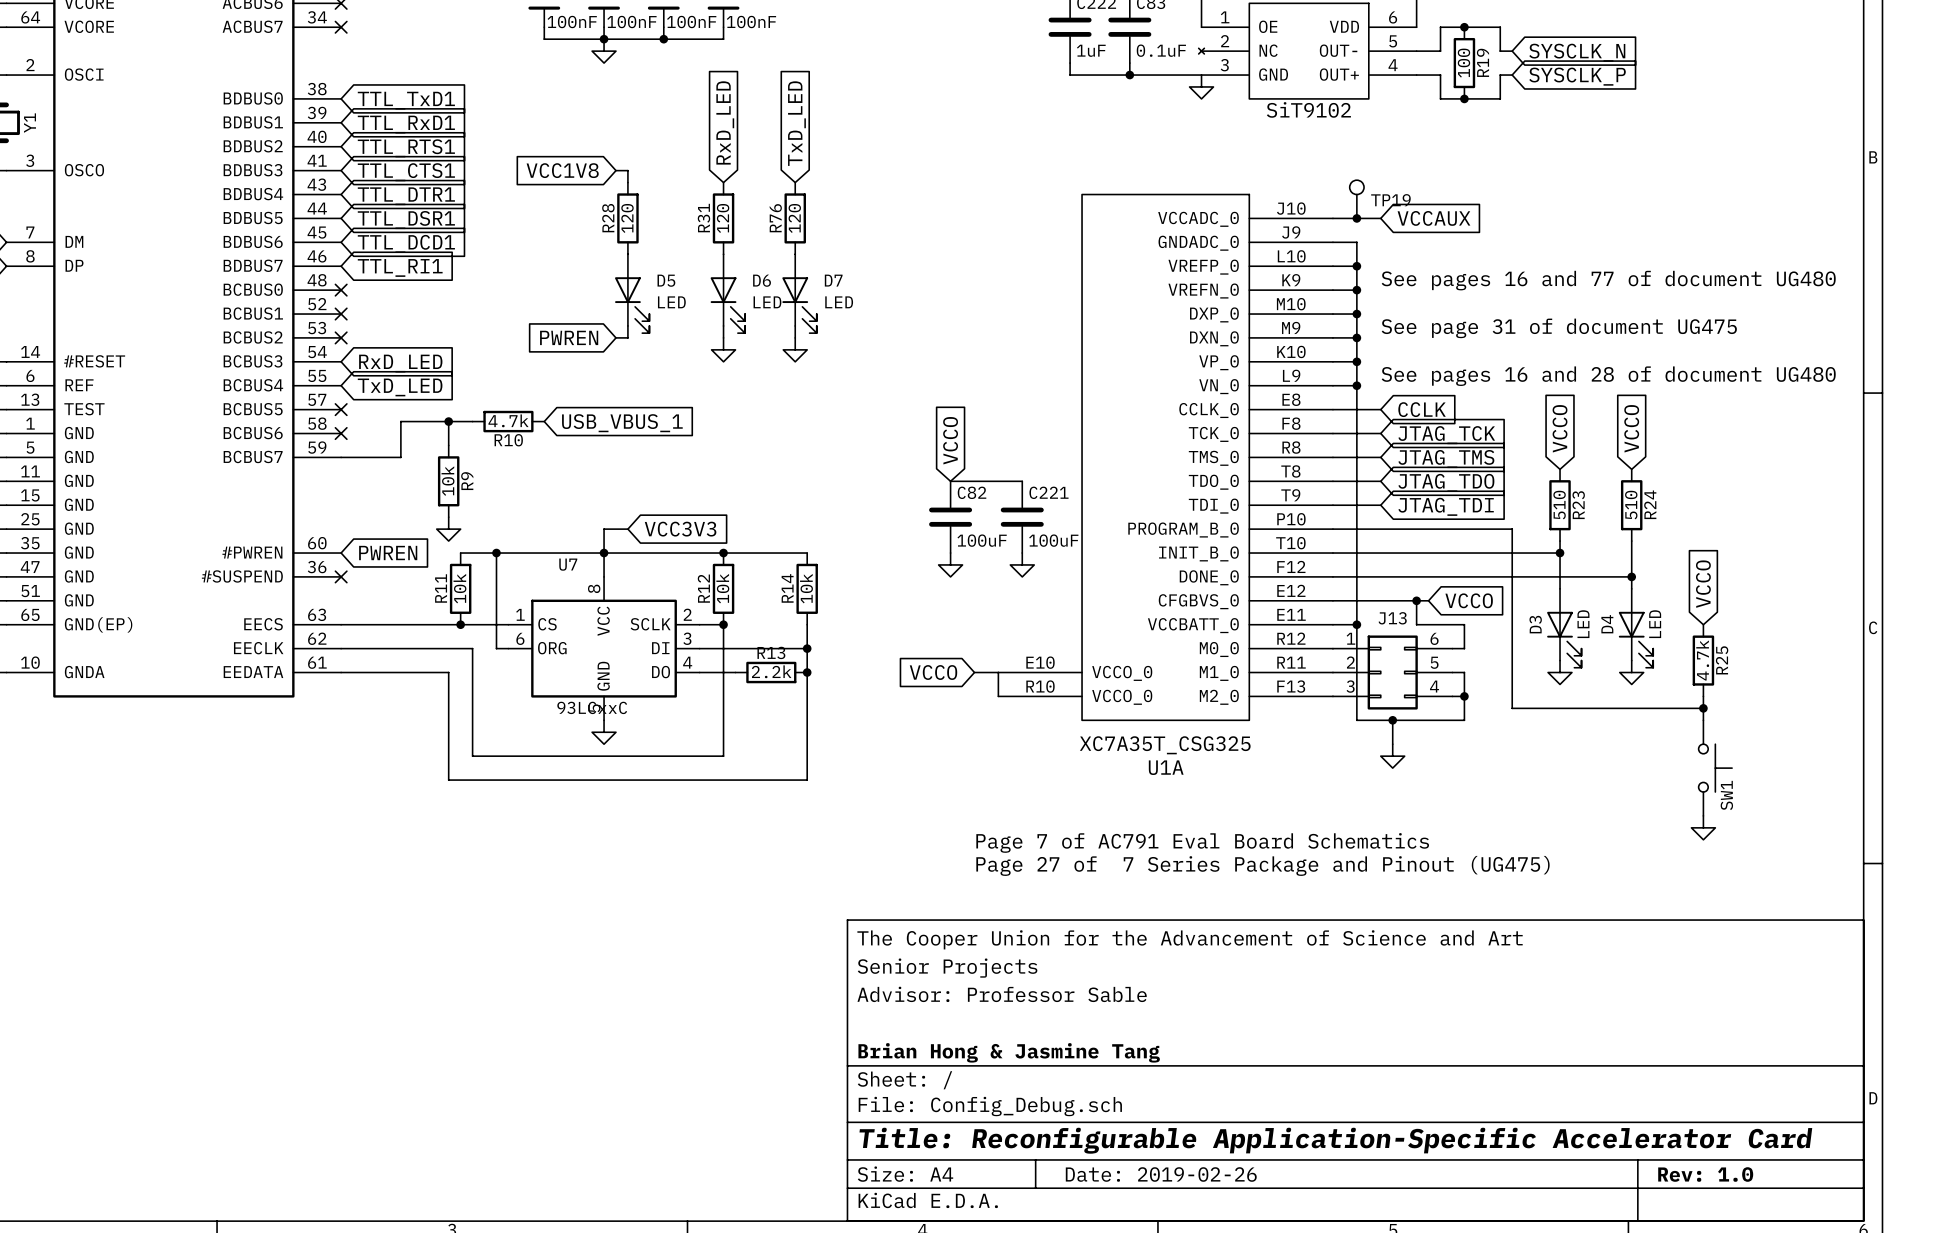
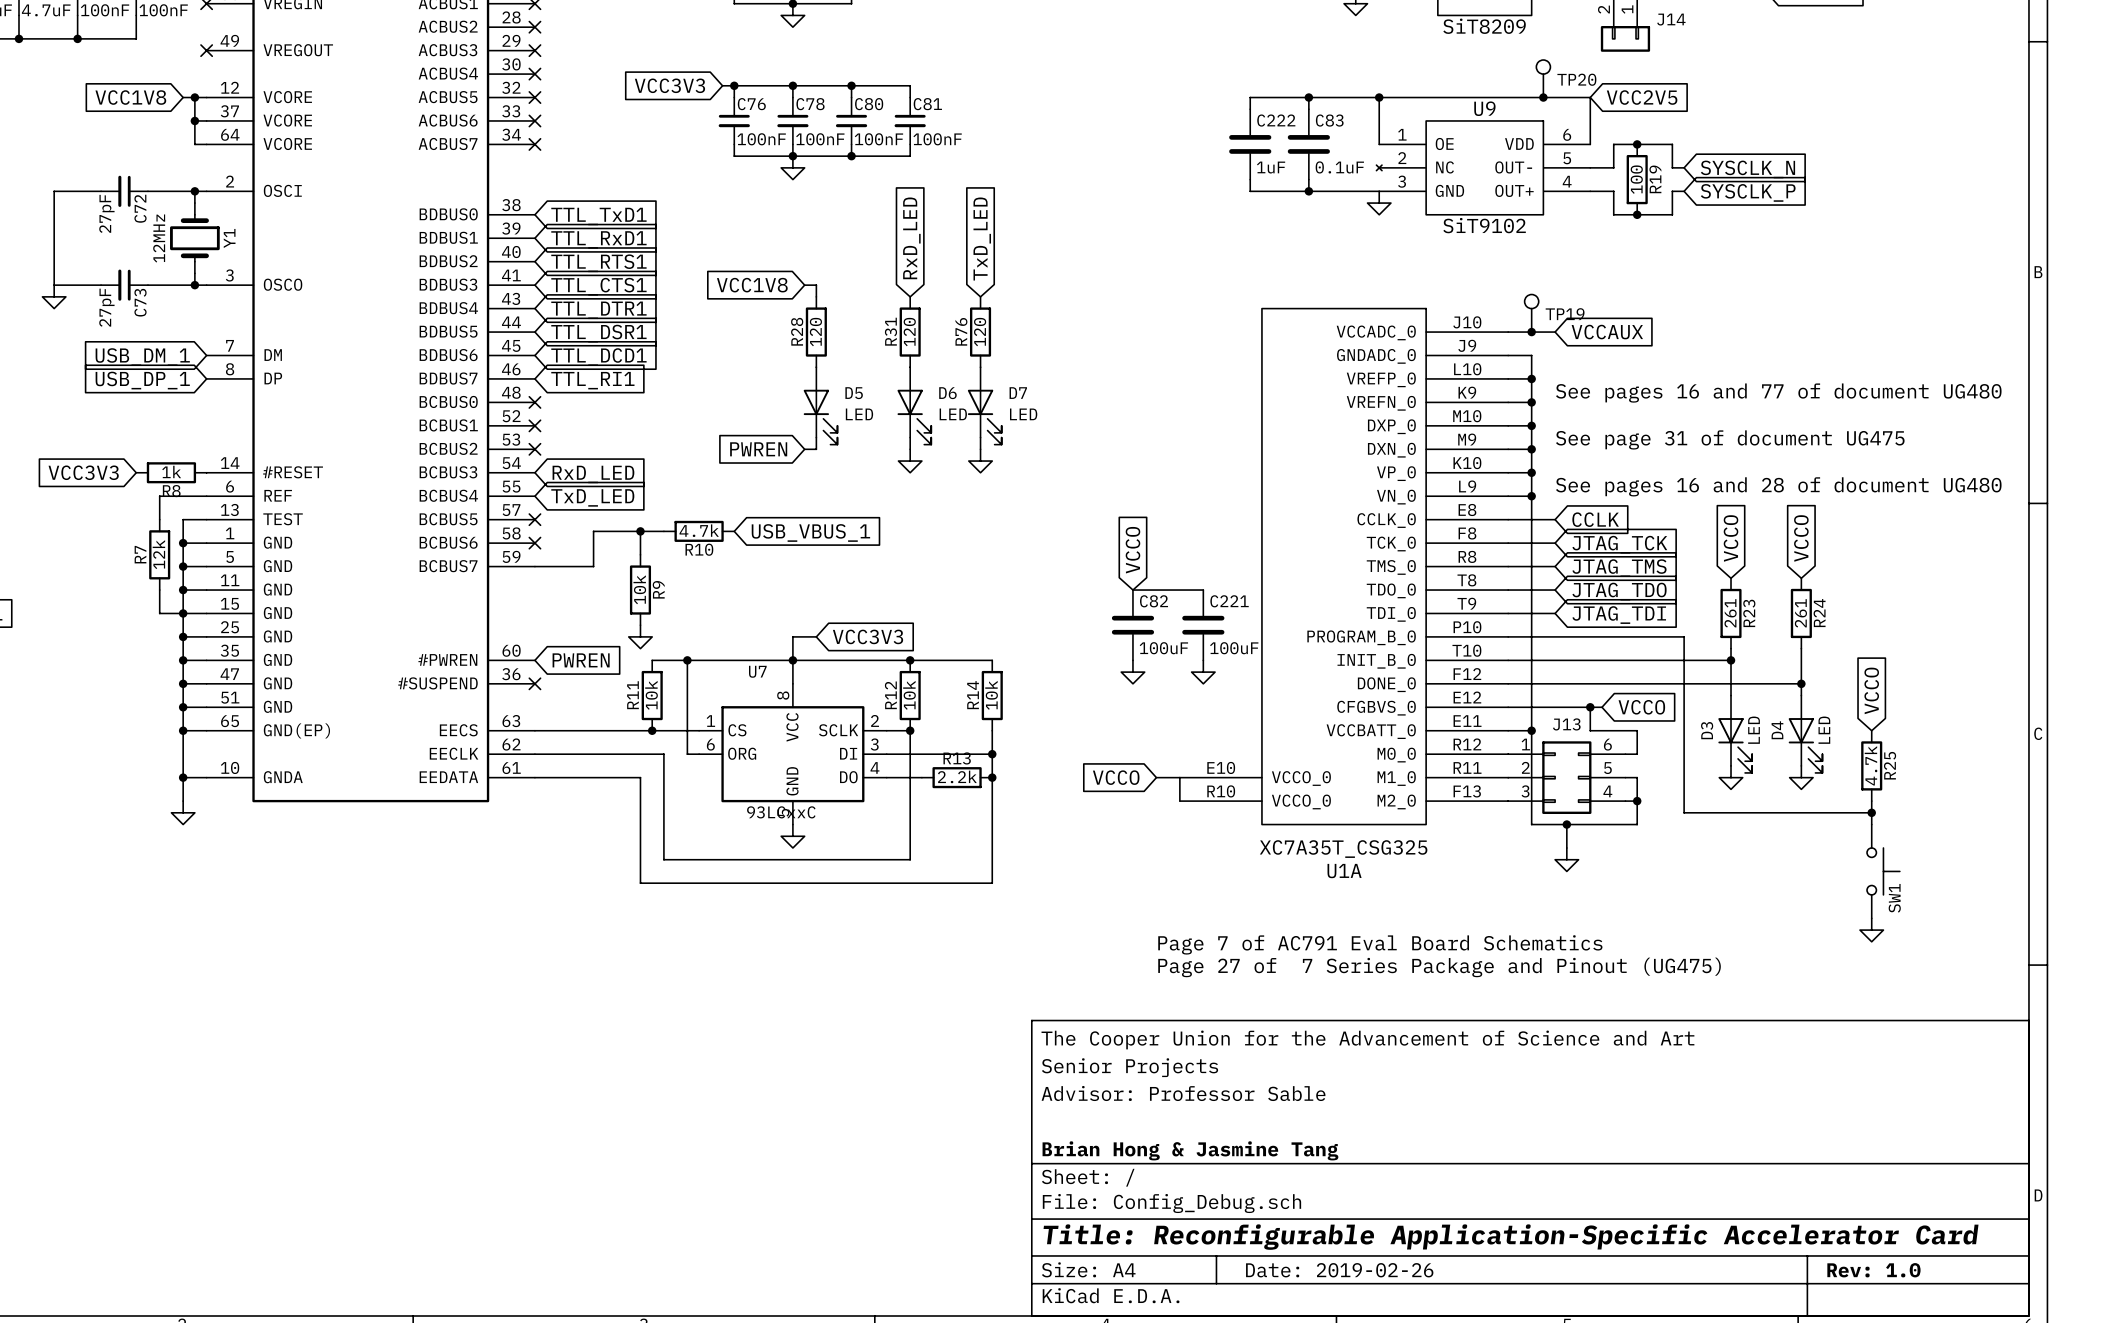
R23 value: 510 (1559, 505) -> 261 (1730, 613)
R24 value: 510 (1631, 505) -> 261 (1800, 613)

